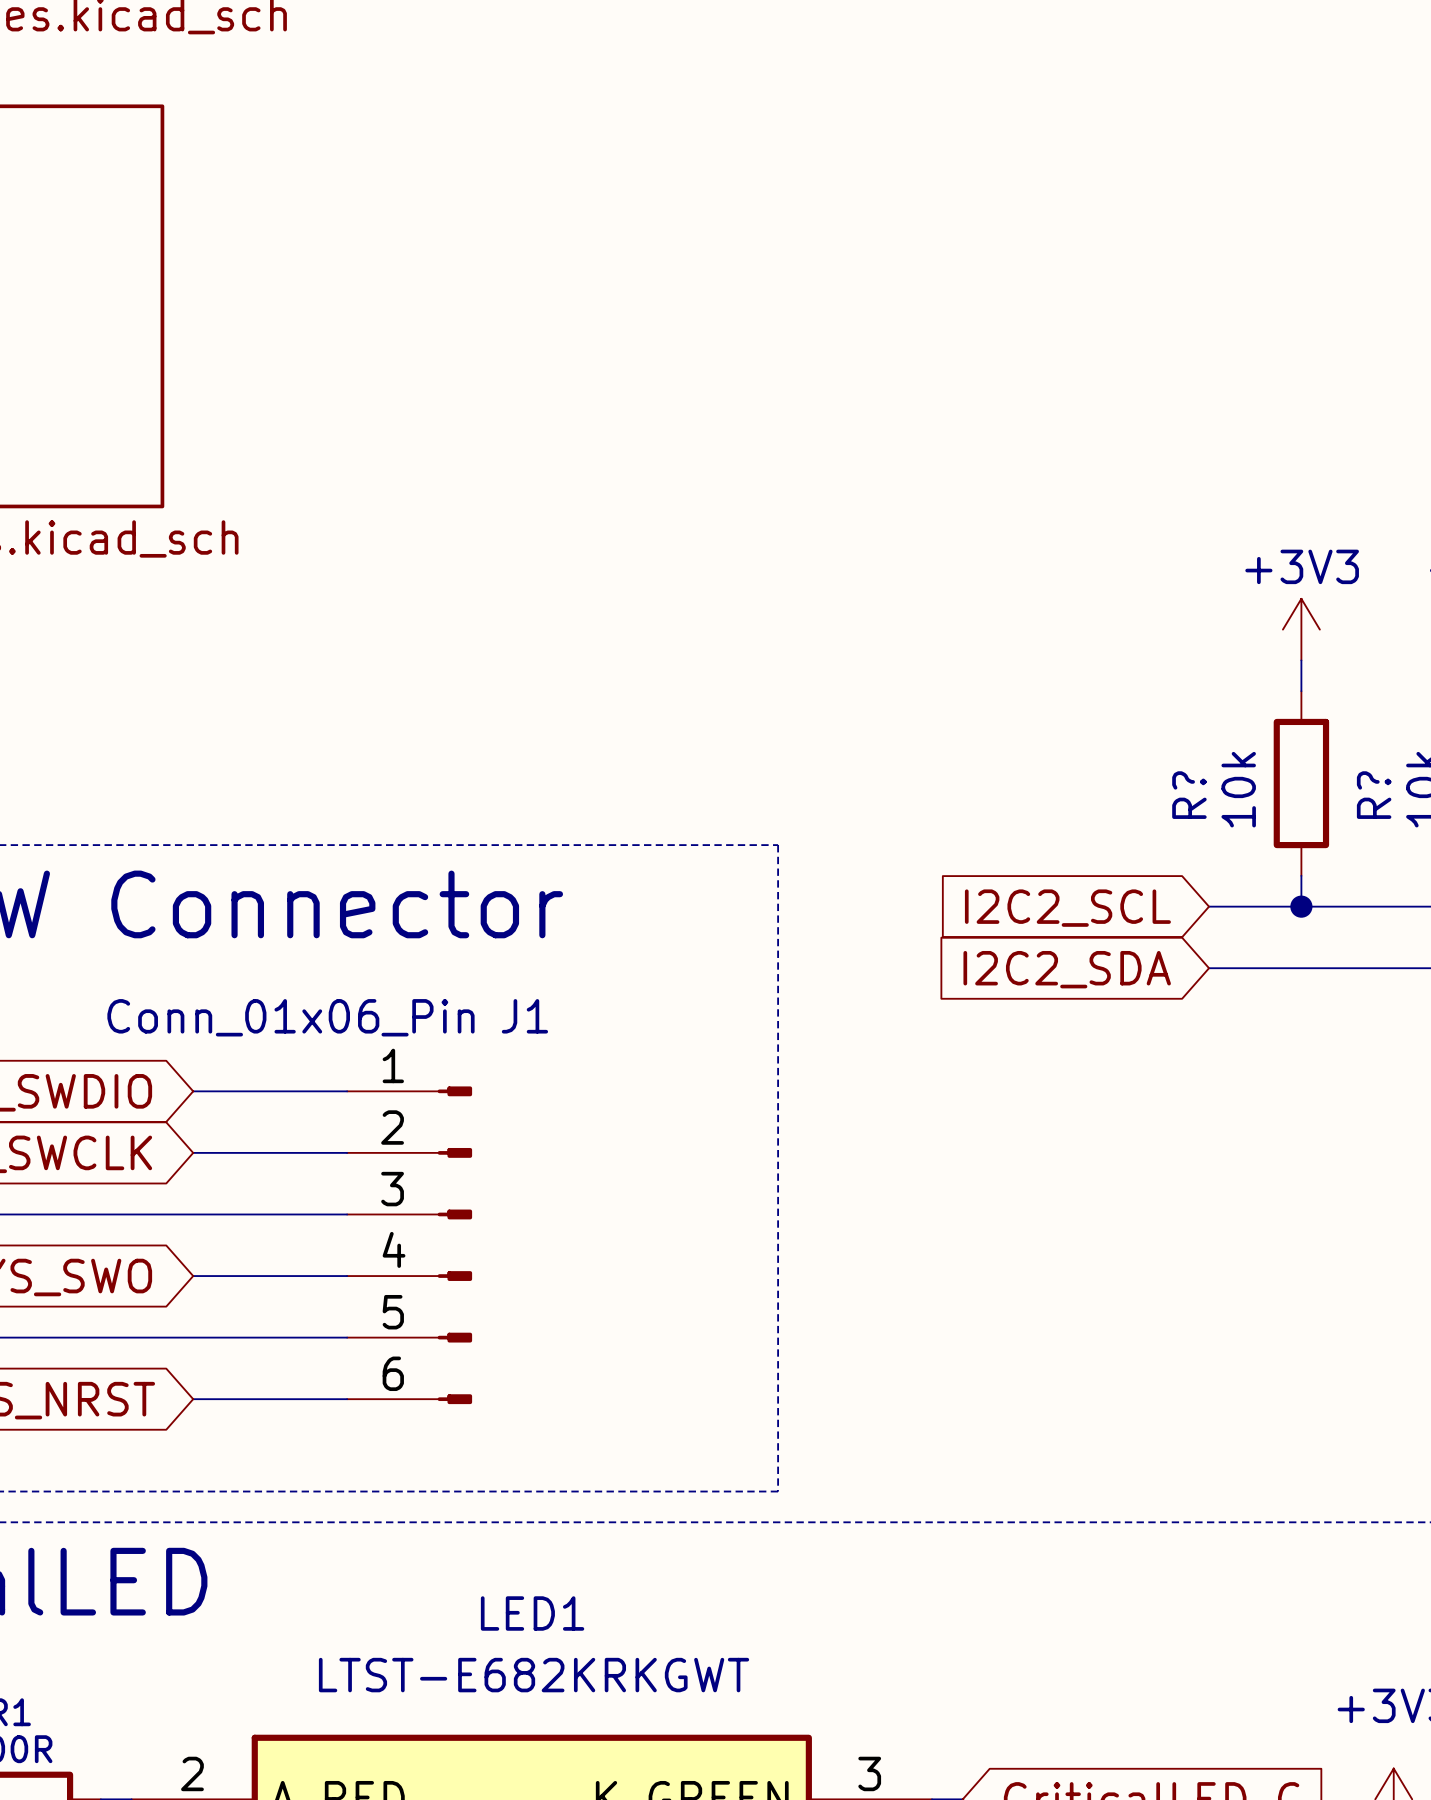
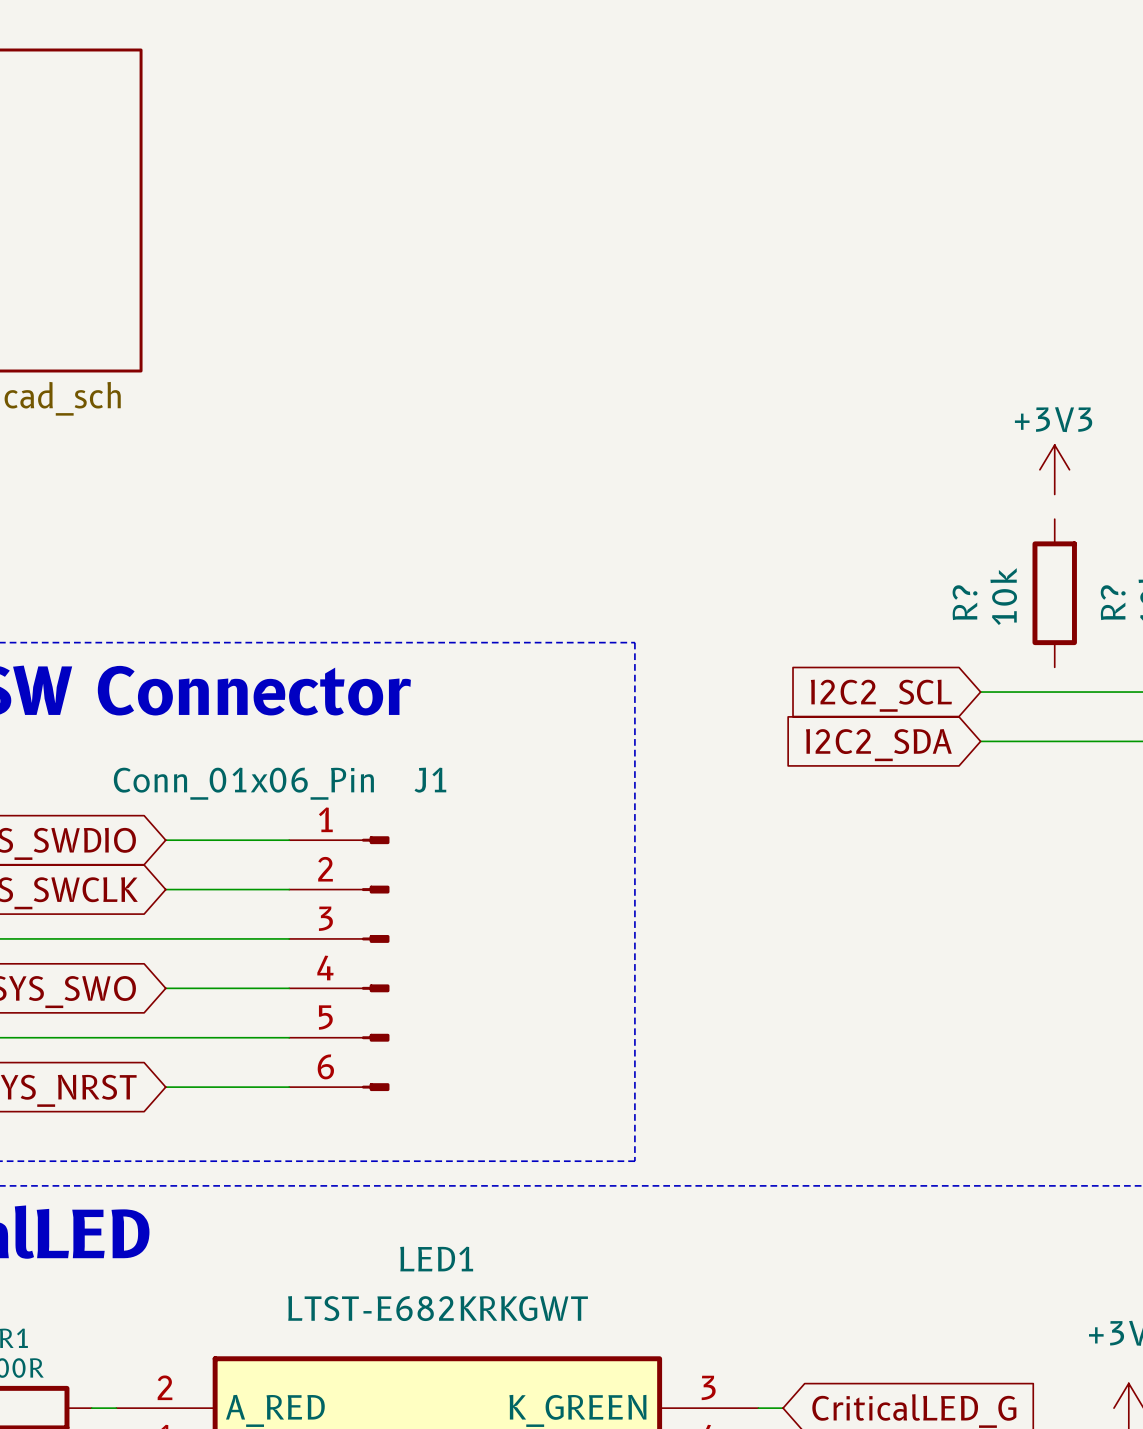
wire: (1301, 660) (1301, 691) -> none
wire: (1301, 875) (1301, 906) -> none
junction: (1301, 906) -> none

